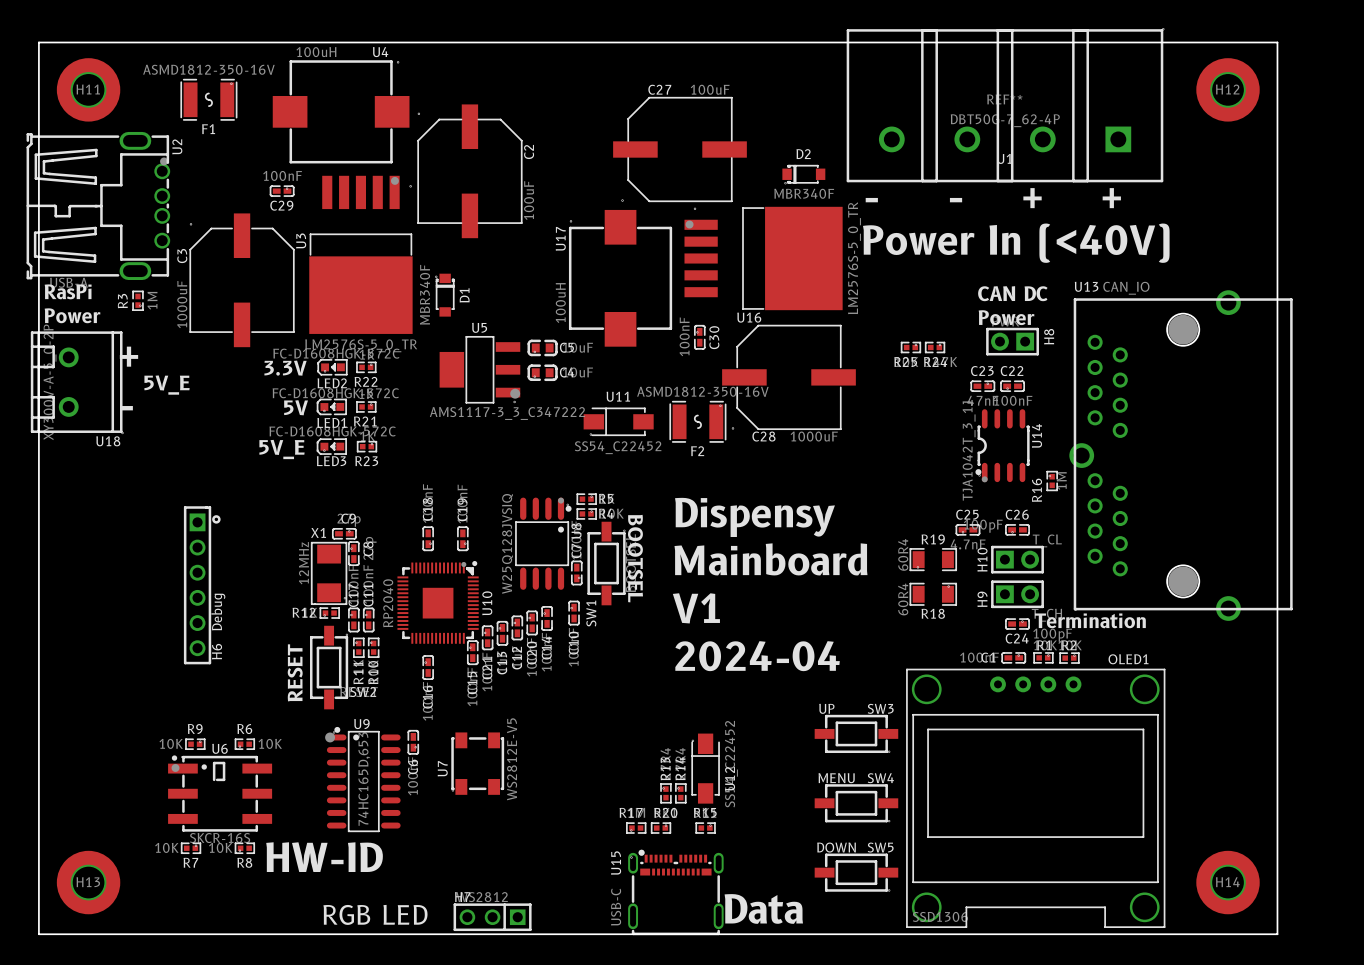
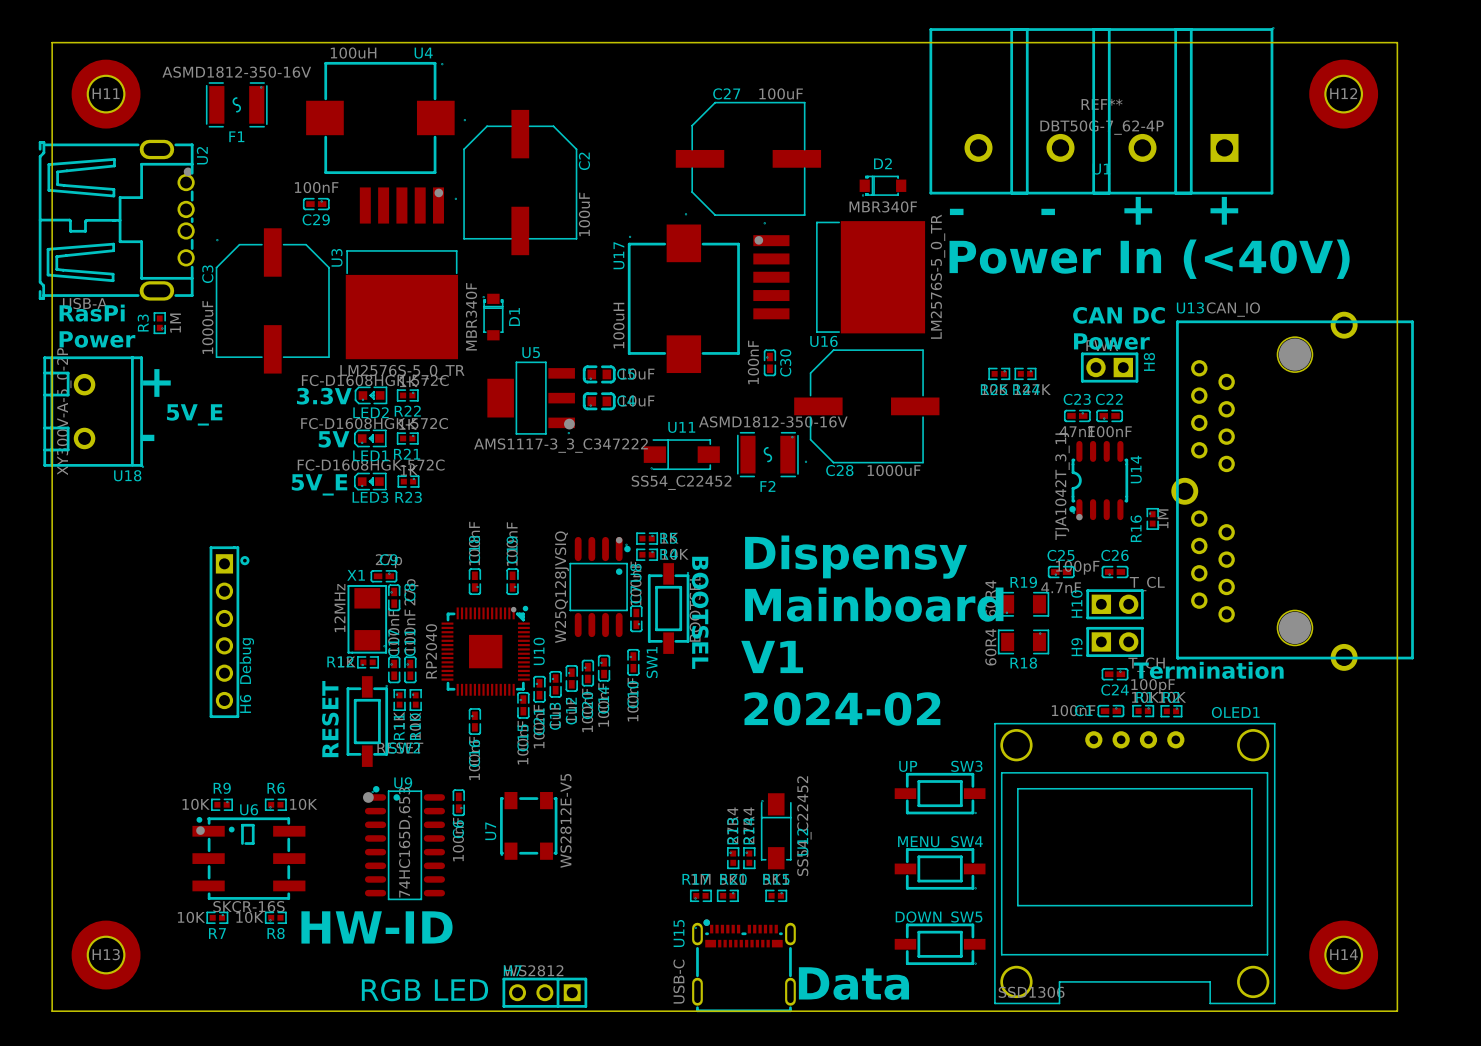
text: 2024-04 (757, 656) -> 2024-02 (842, 708)

